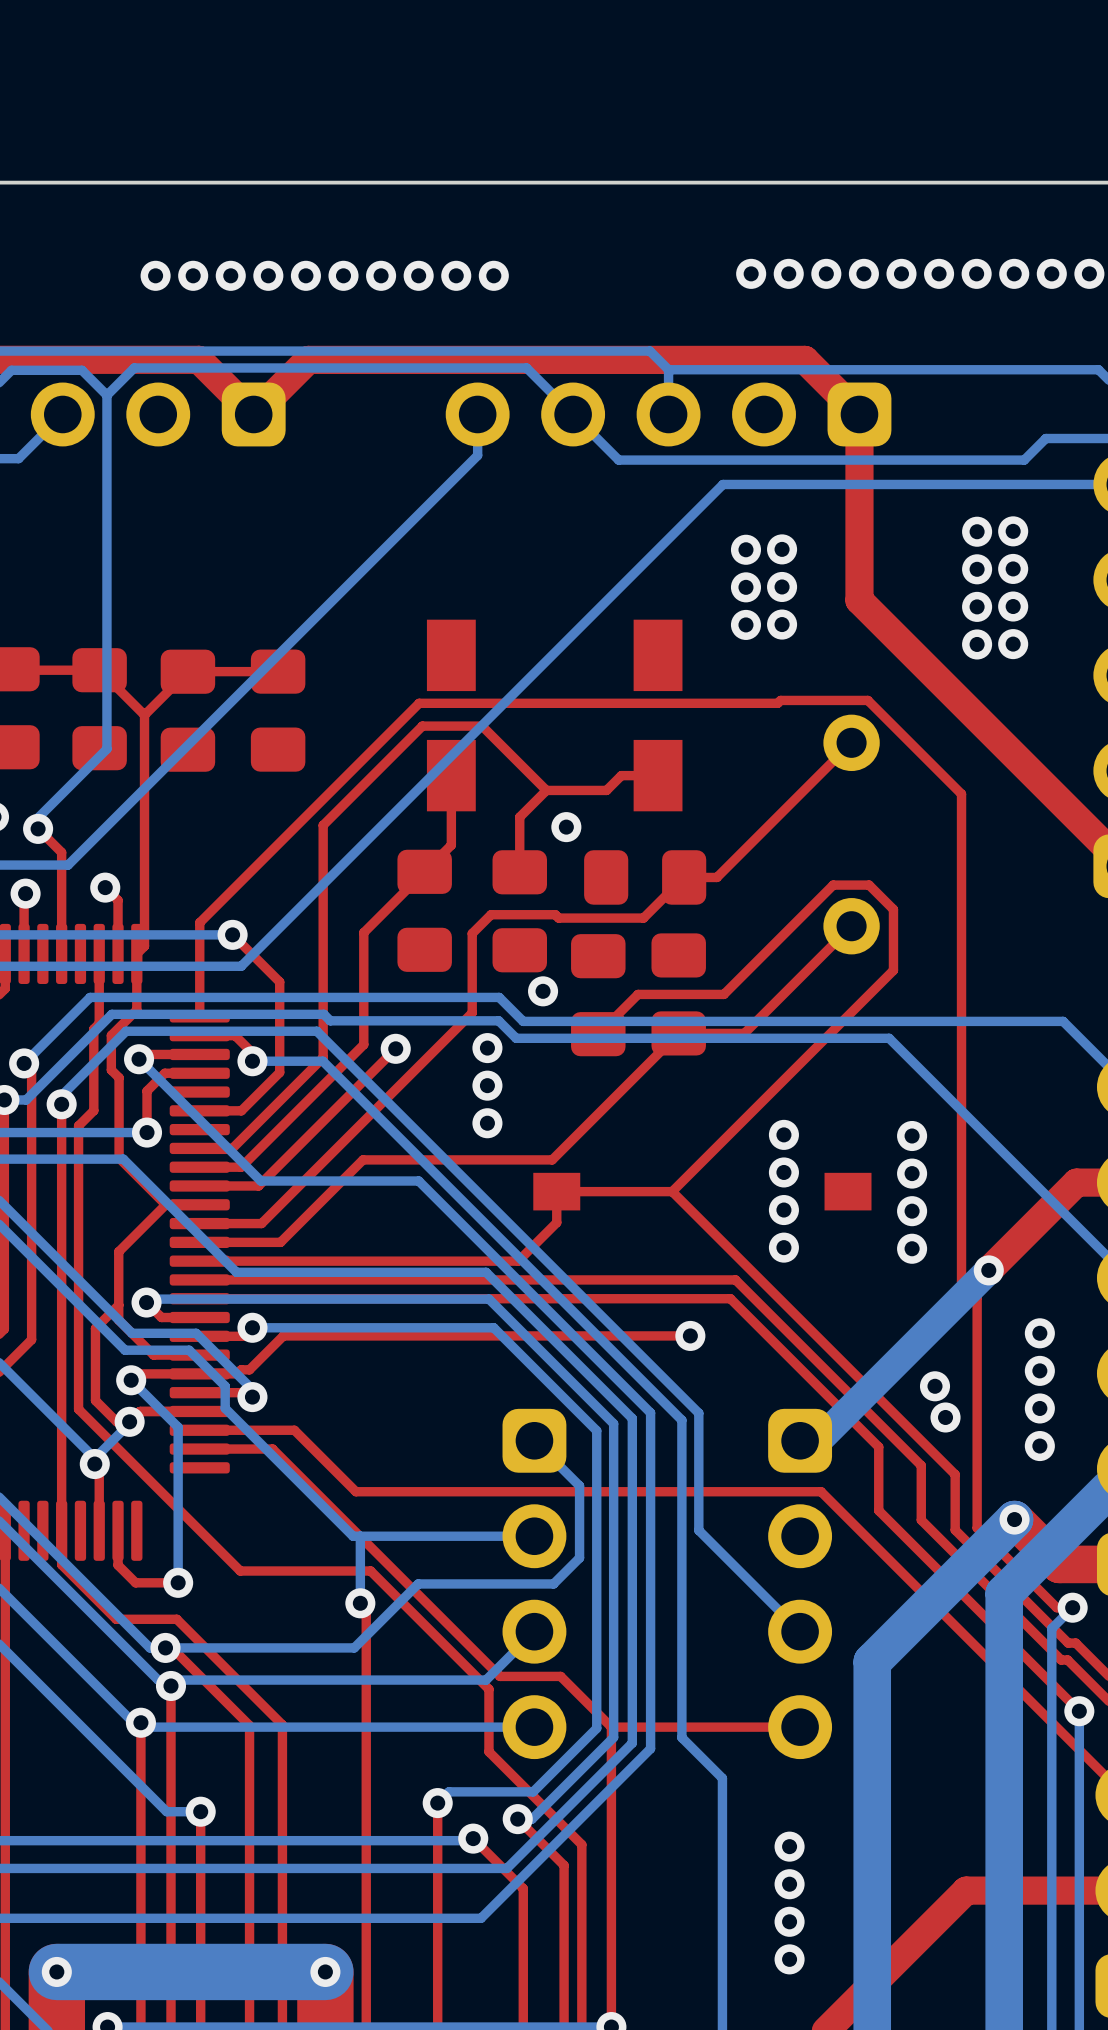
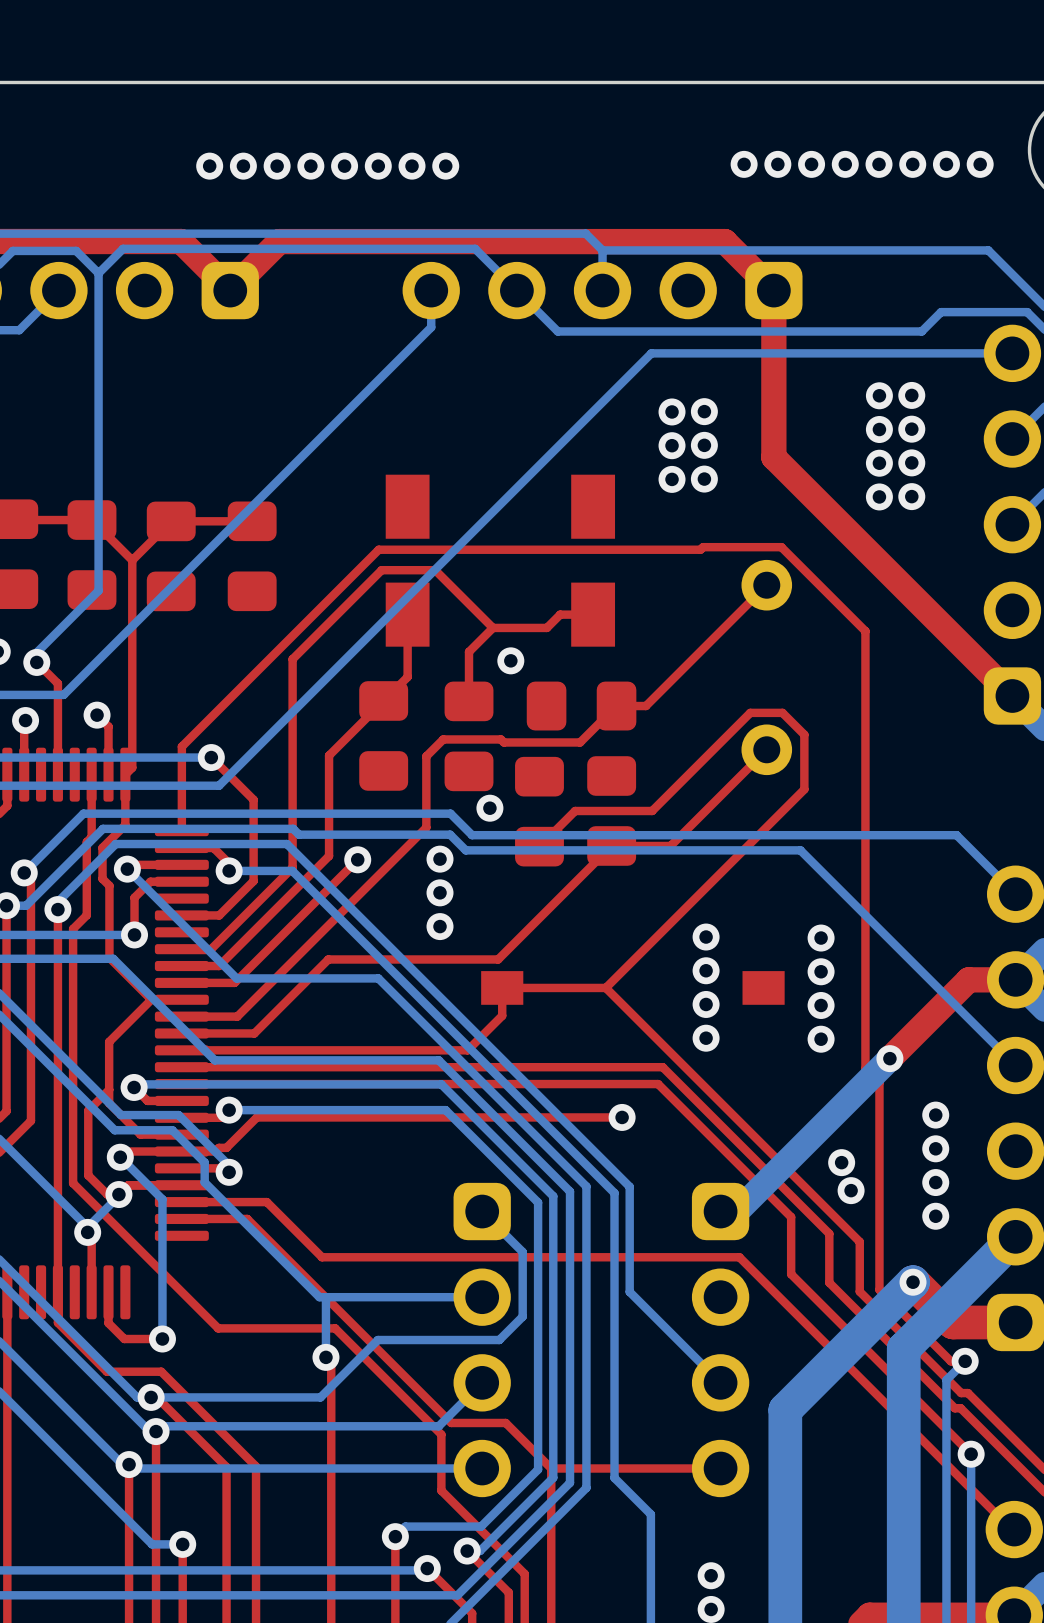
via: (751, 273) -> none
via: (788, 273) -> none
via: (155, 275) -> none
via: (193, 275) -> none

